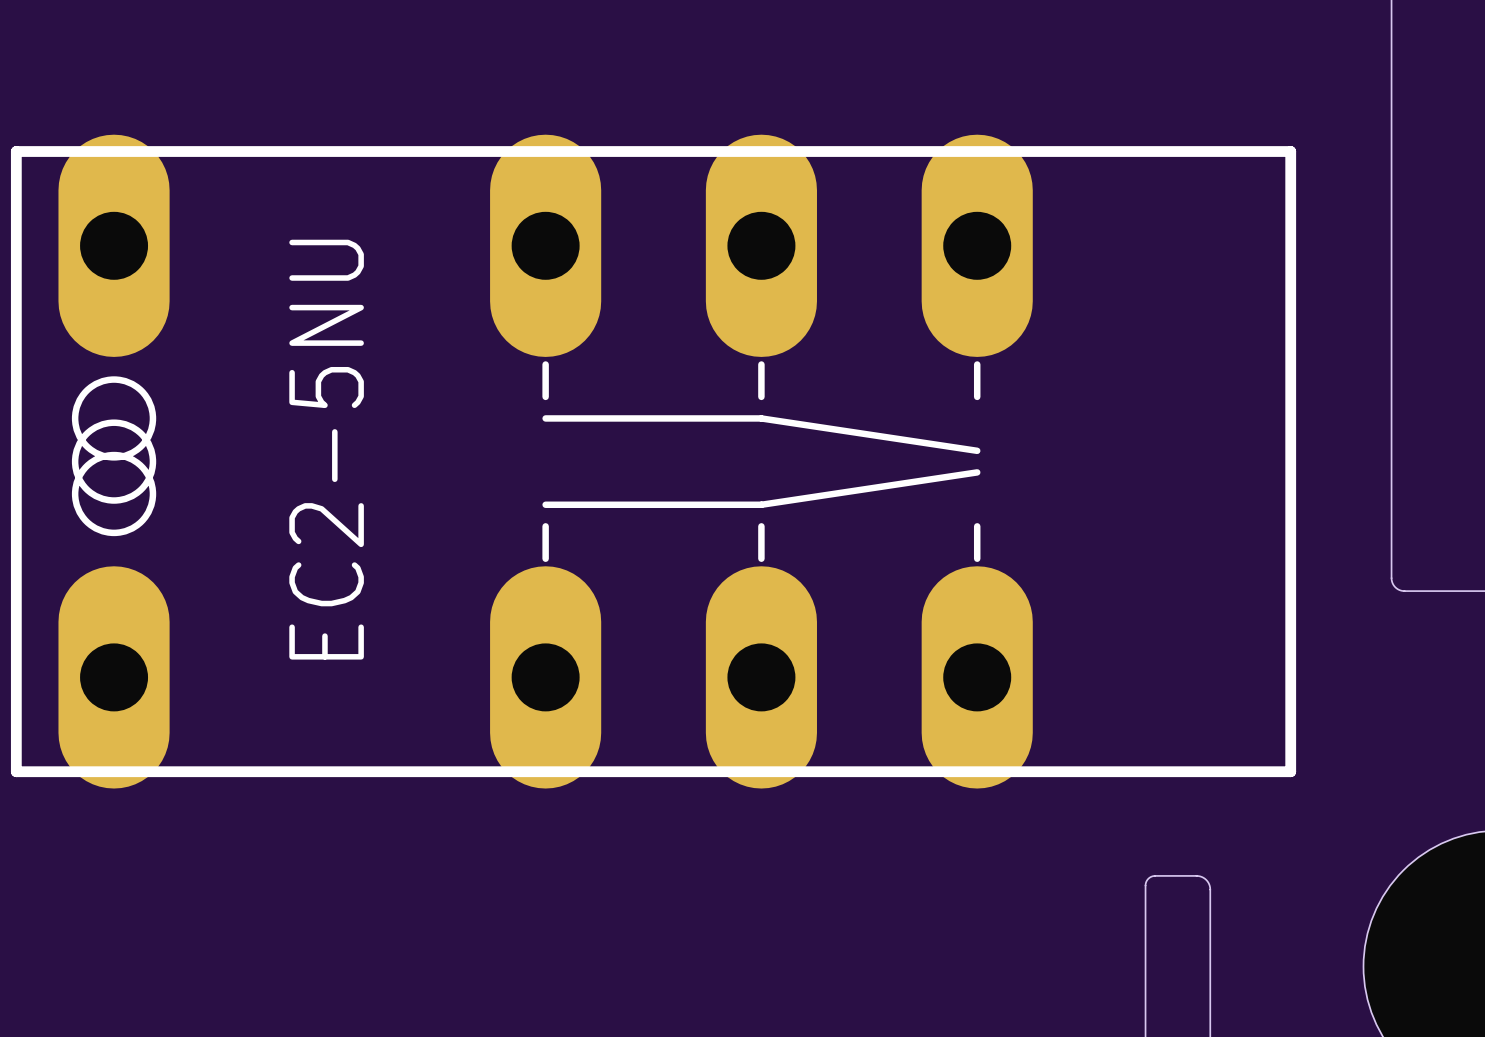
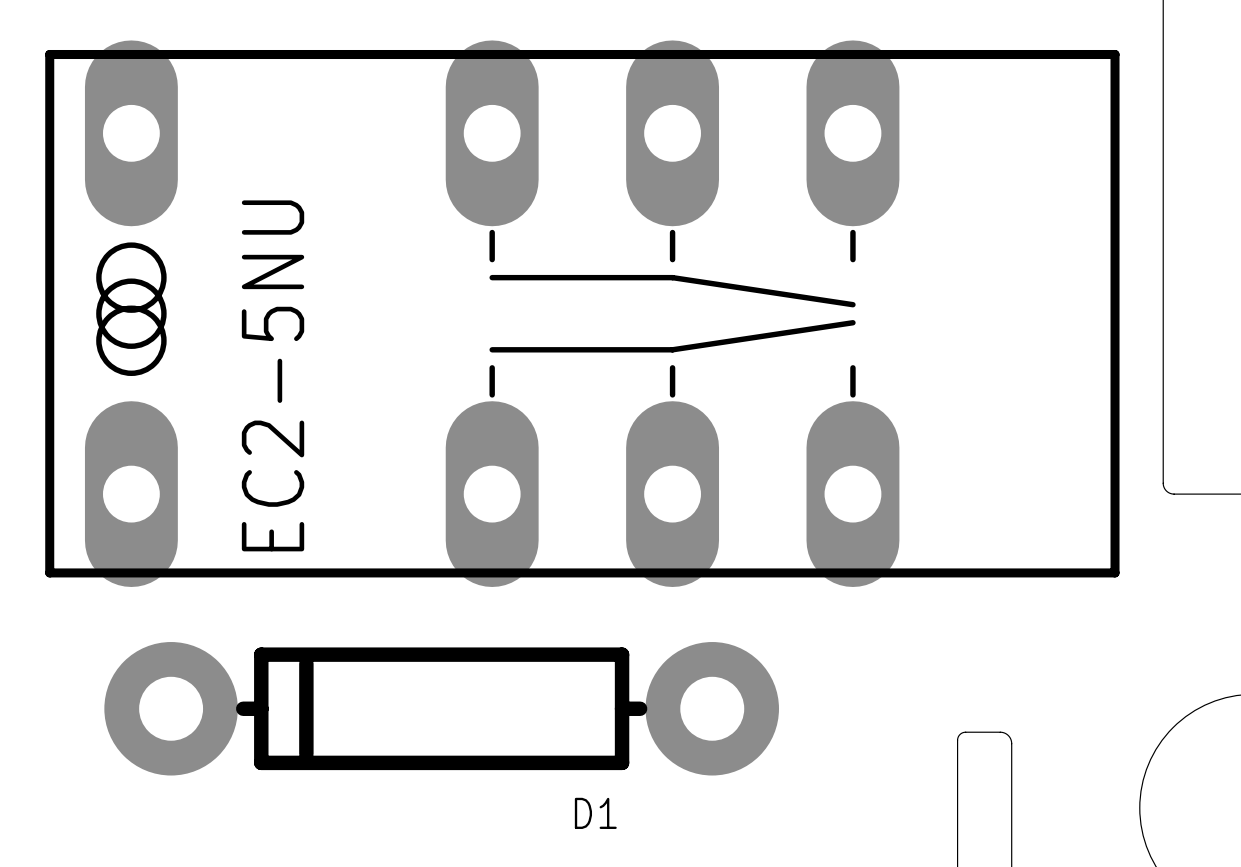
part position: (653, 461) -> (582, 313)
D1: none -> (441, 708)

